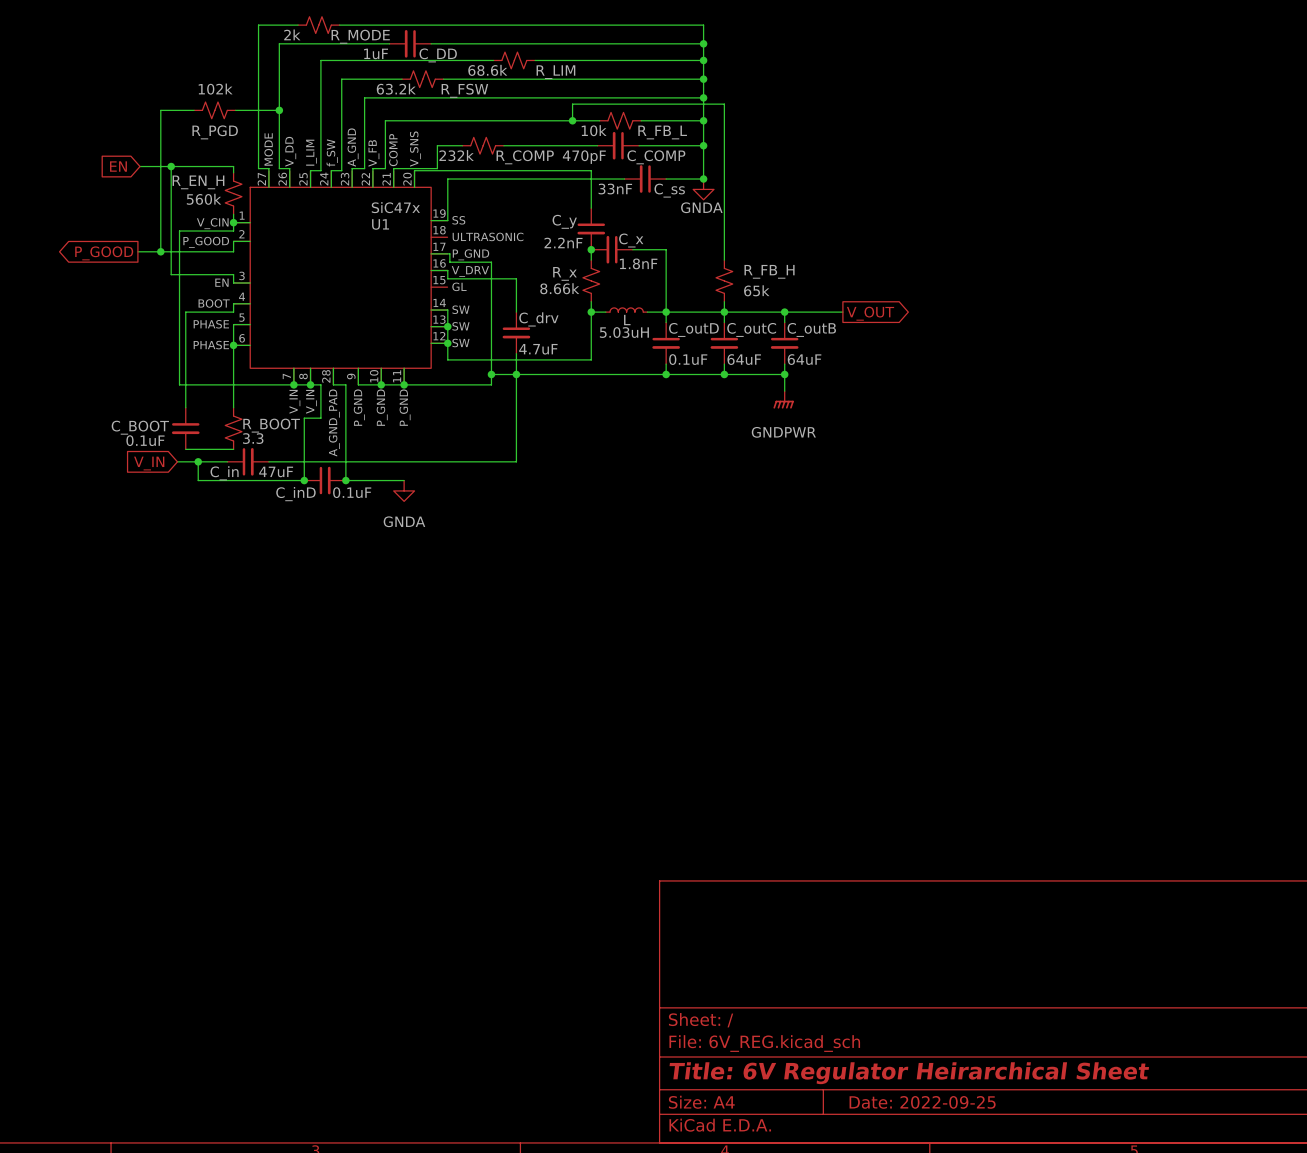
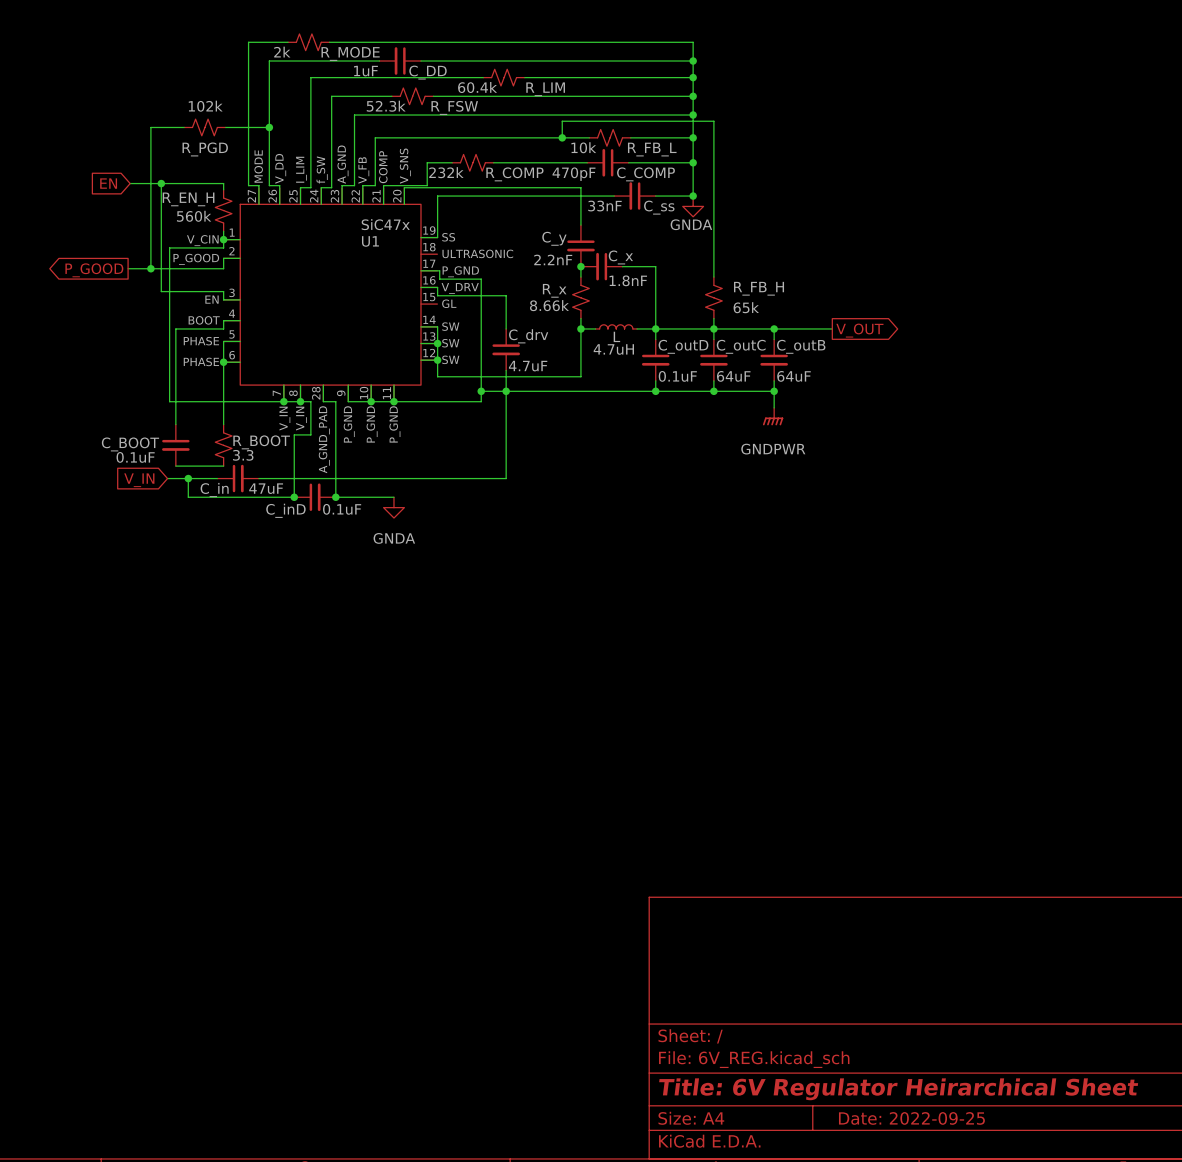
R_LIM value: 68.6k (487, 70) -> 60.4k (477, 87)
R_FSW value: 63.2k (396, 89) -> 52.3k (386, 106)
L value: 5.03uH (624, 332) -> 4.7uH (613, 349)

